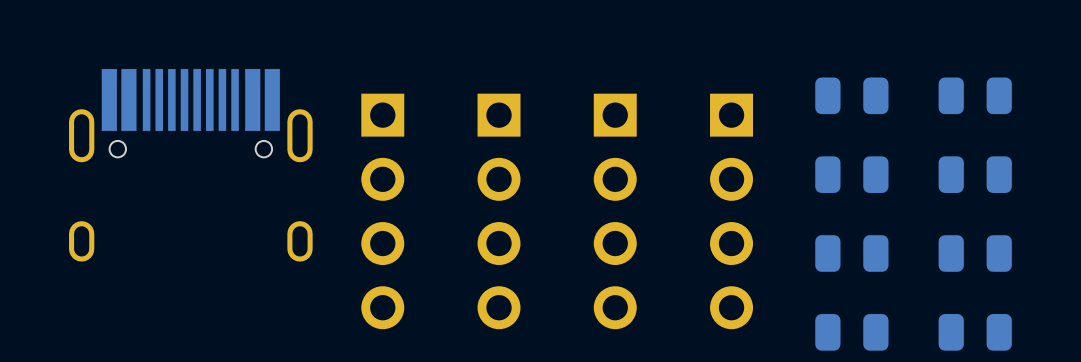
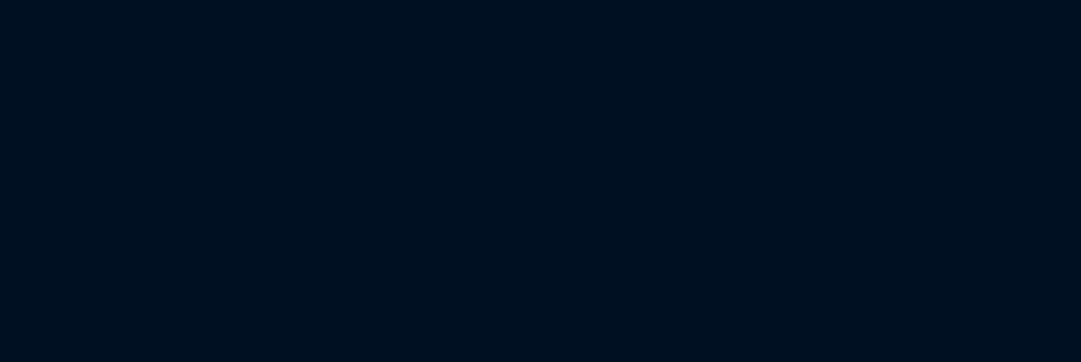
part: (851, 95) -> none
part: (975, 95) -> none
part: (190, 165) -> none
part: (851, 174) -> none
part: (975, 174) -> none
part: (382, 211) -> none
part: (499, 211) -> none
part: (615, 211) -> none
part: (731, 211) -> none
part: (851, 253) -> none
part: (975, 253) -> none
part: (851, 332) -> none
part: (975, 332) -> none

